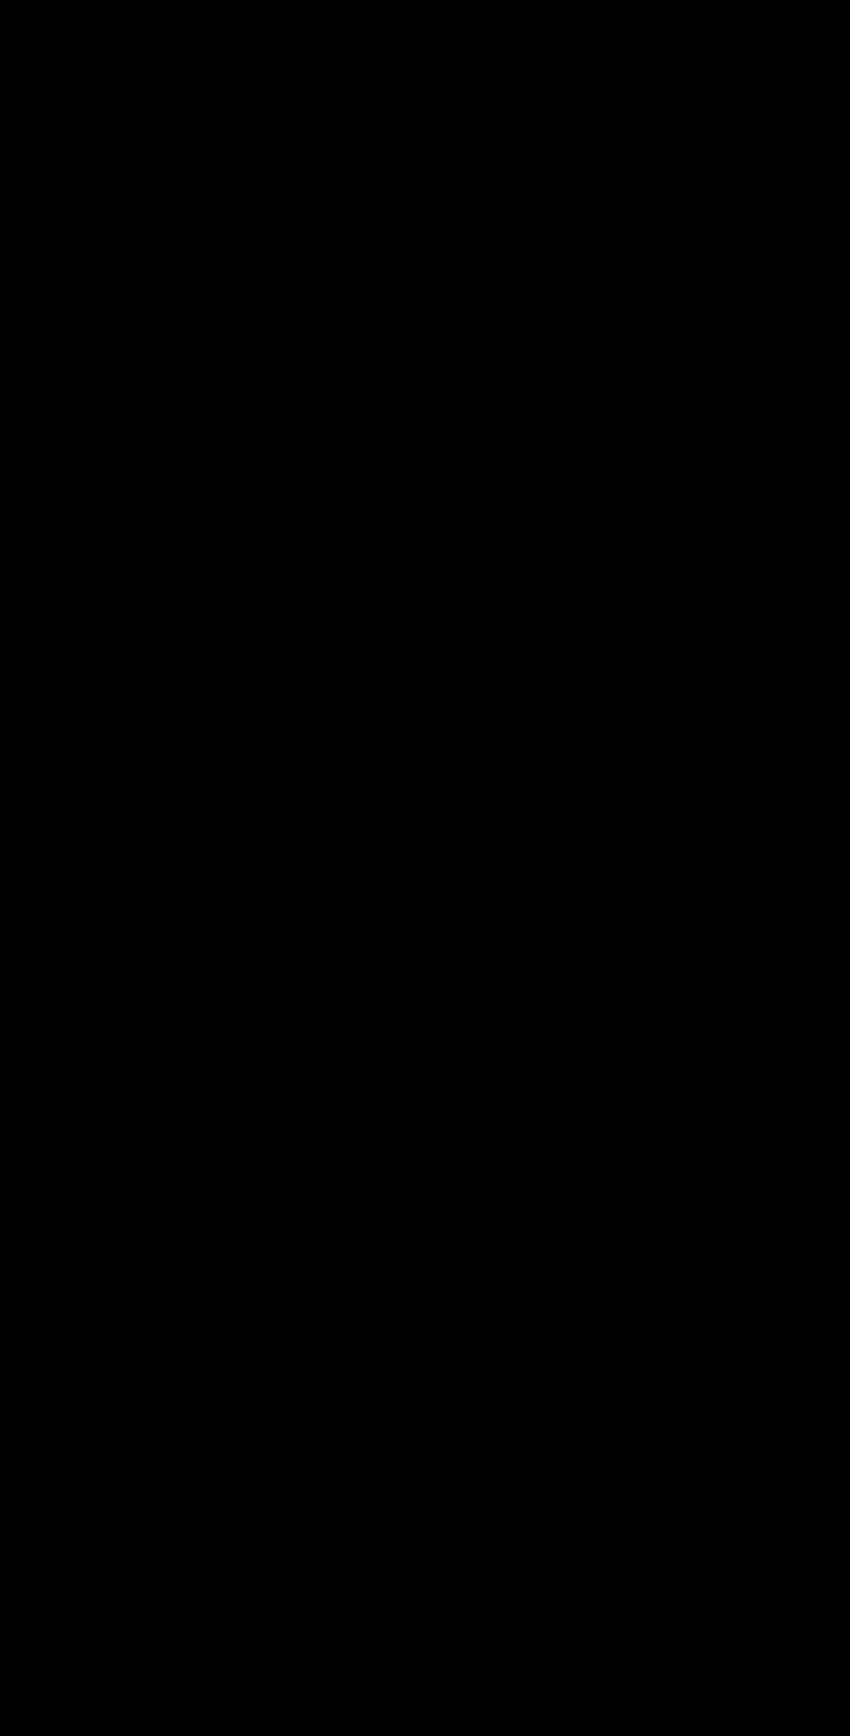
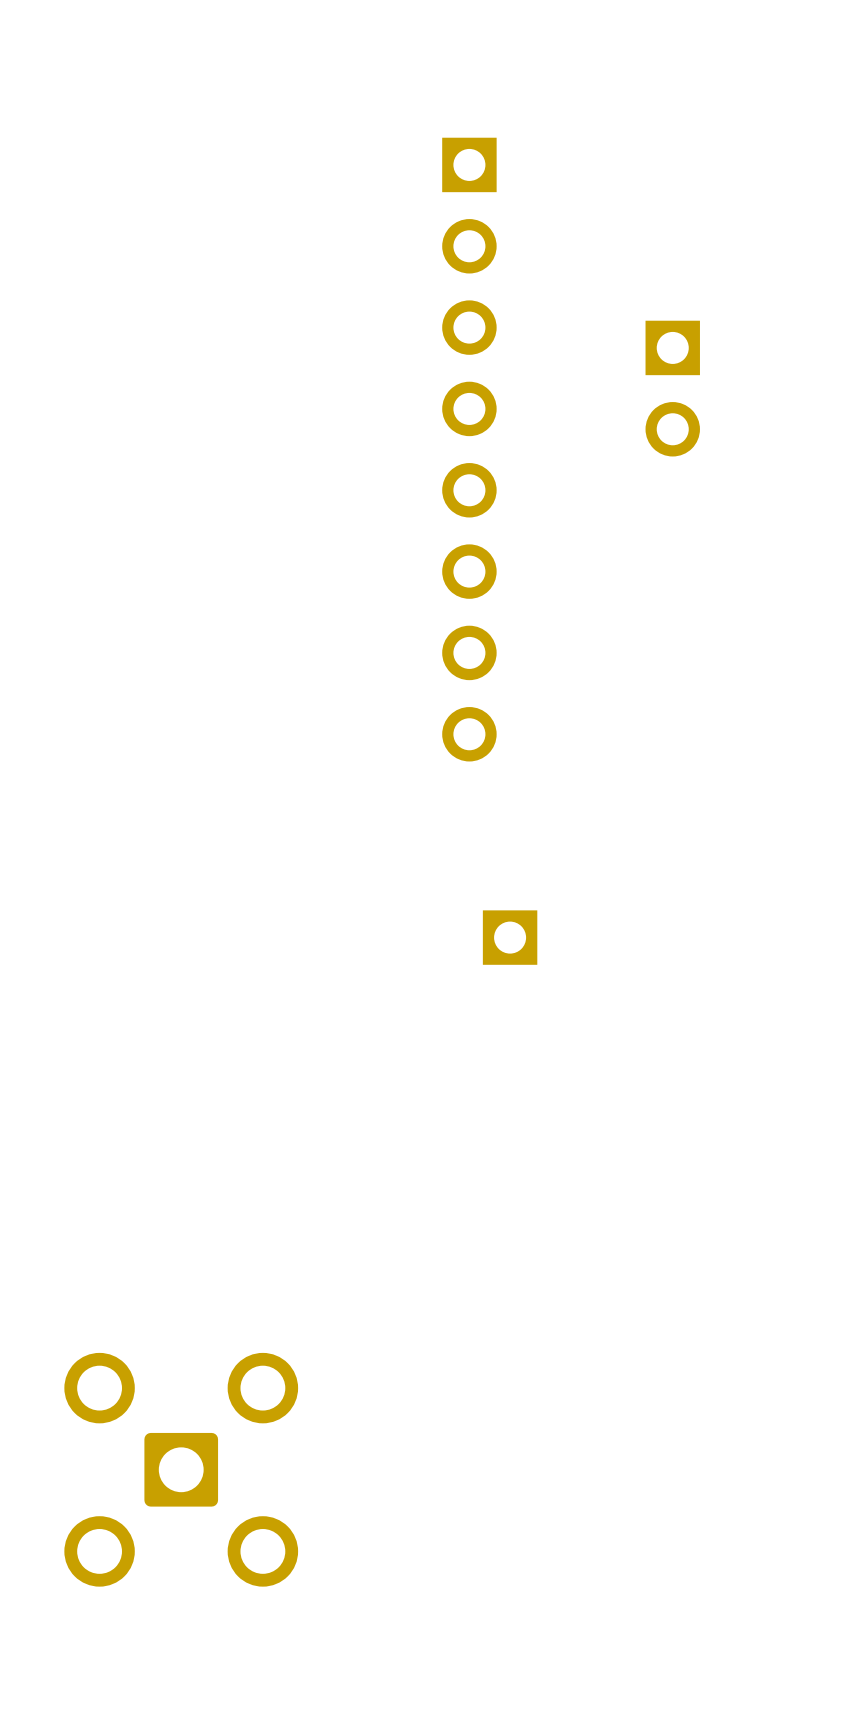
part: none -> (672, 388)
part: none -> (469, 449)
part: none -> (510, 937)
part: none -> (181, 1469)

